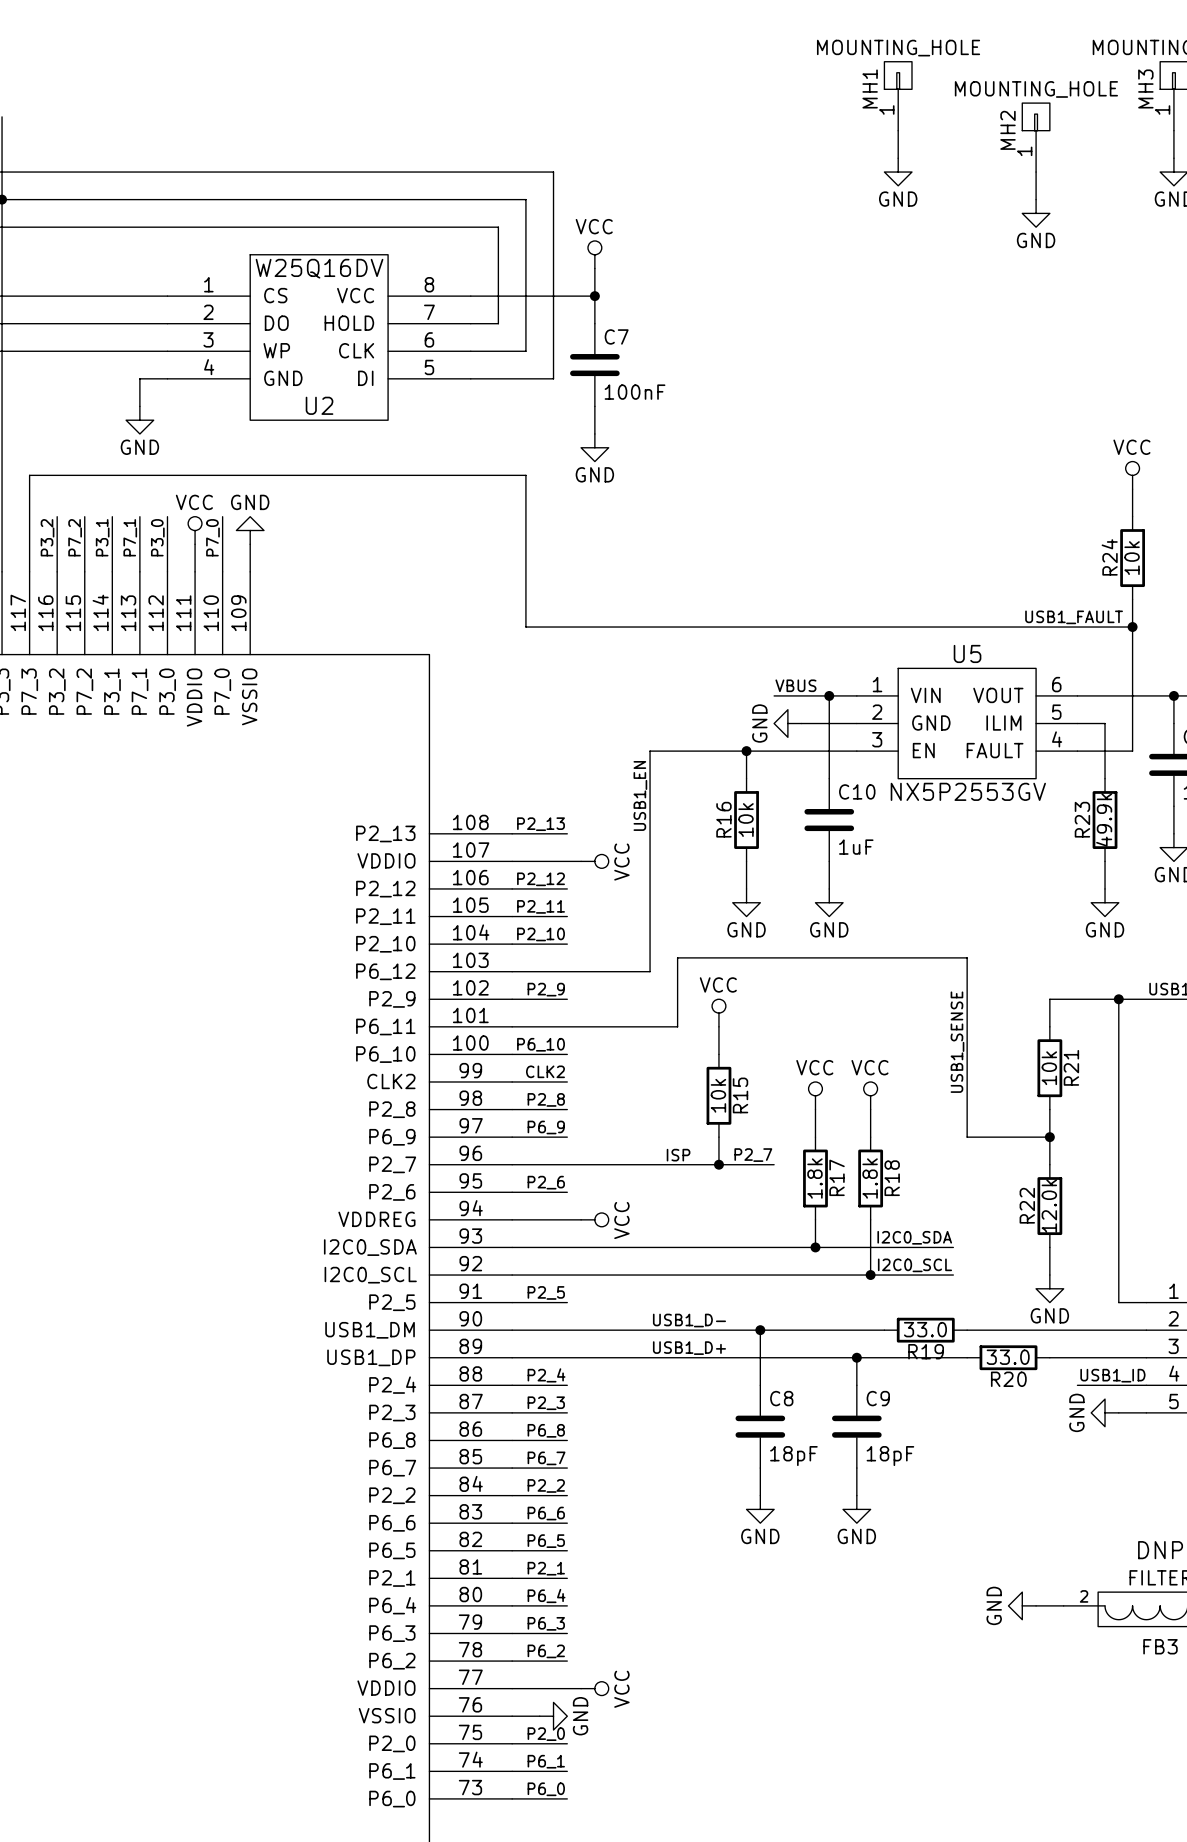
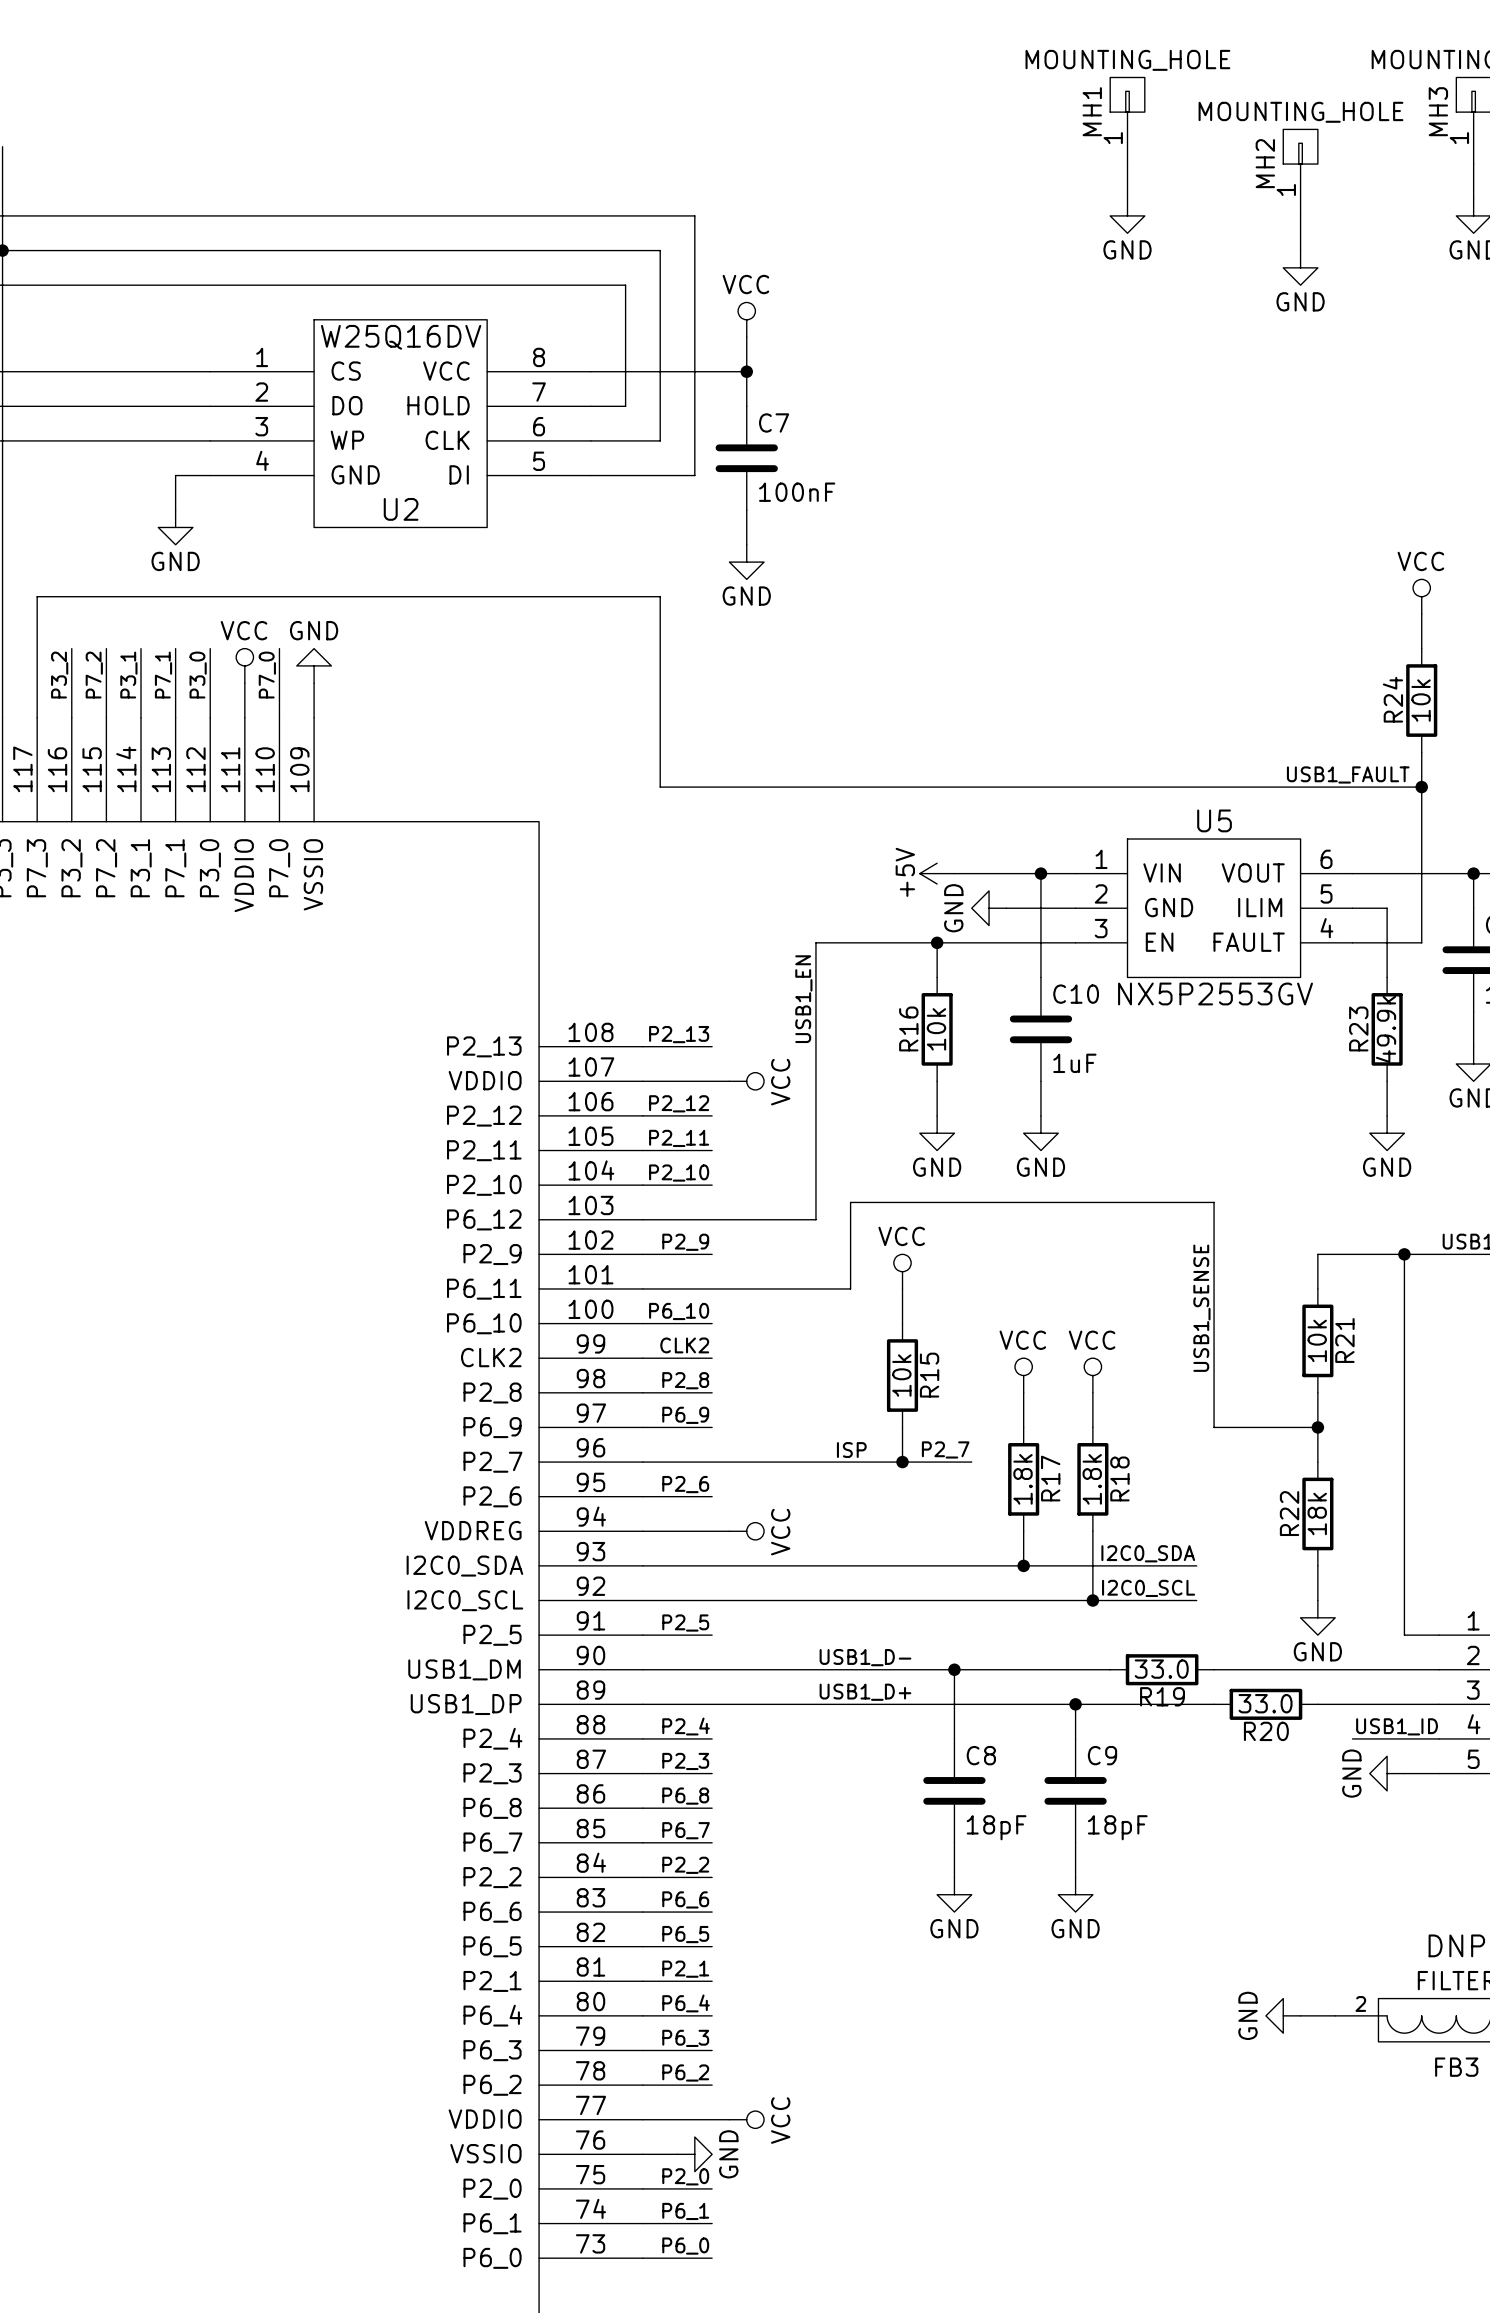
label: VBUS (795, 685) -> none
power symbol: none -> +5V (937, 873)
wire: none -> (954, 873) (971, 873)
R22 value: 12.0k (1049, 1206) -> 18k (1317, 1513)

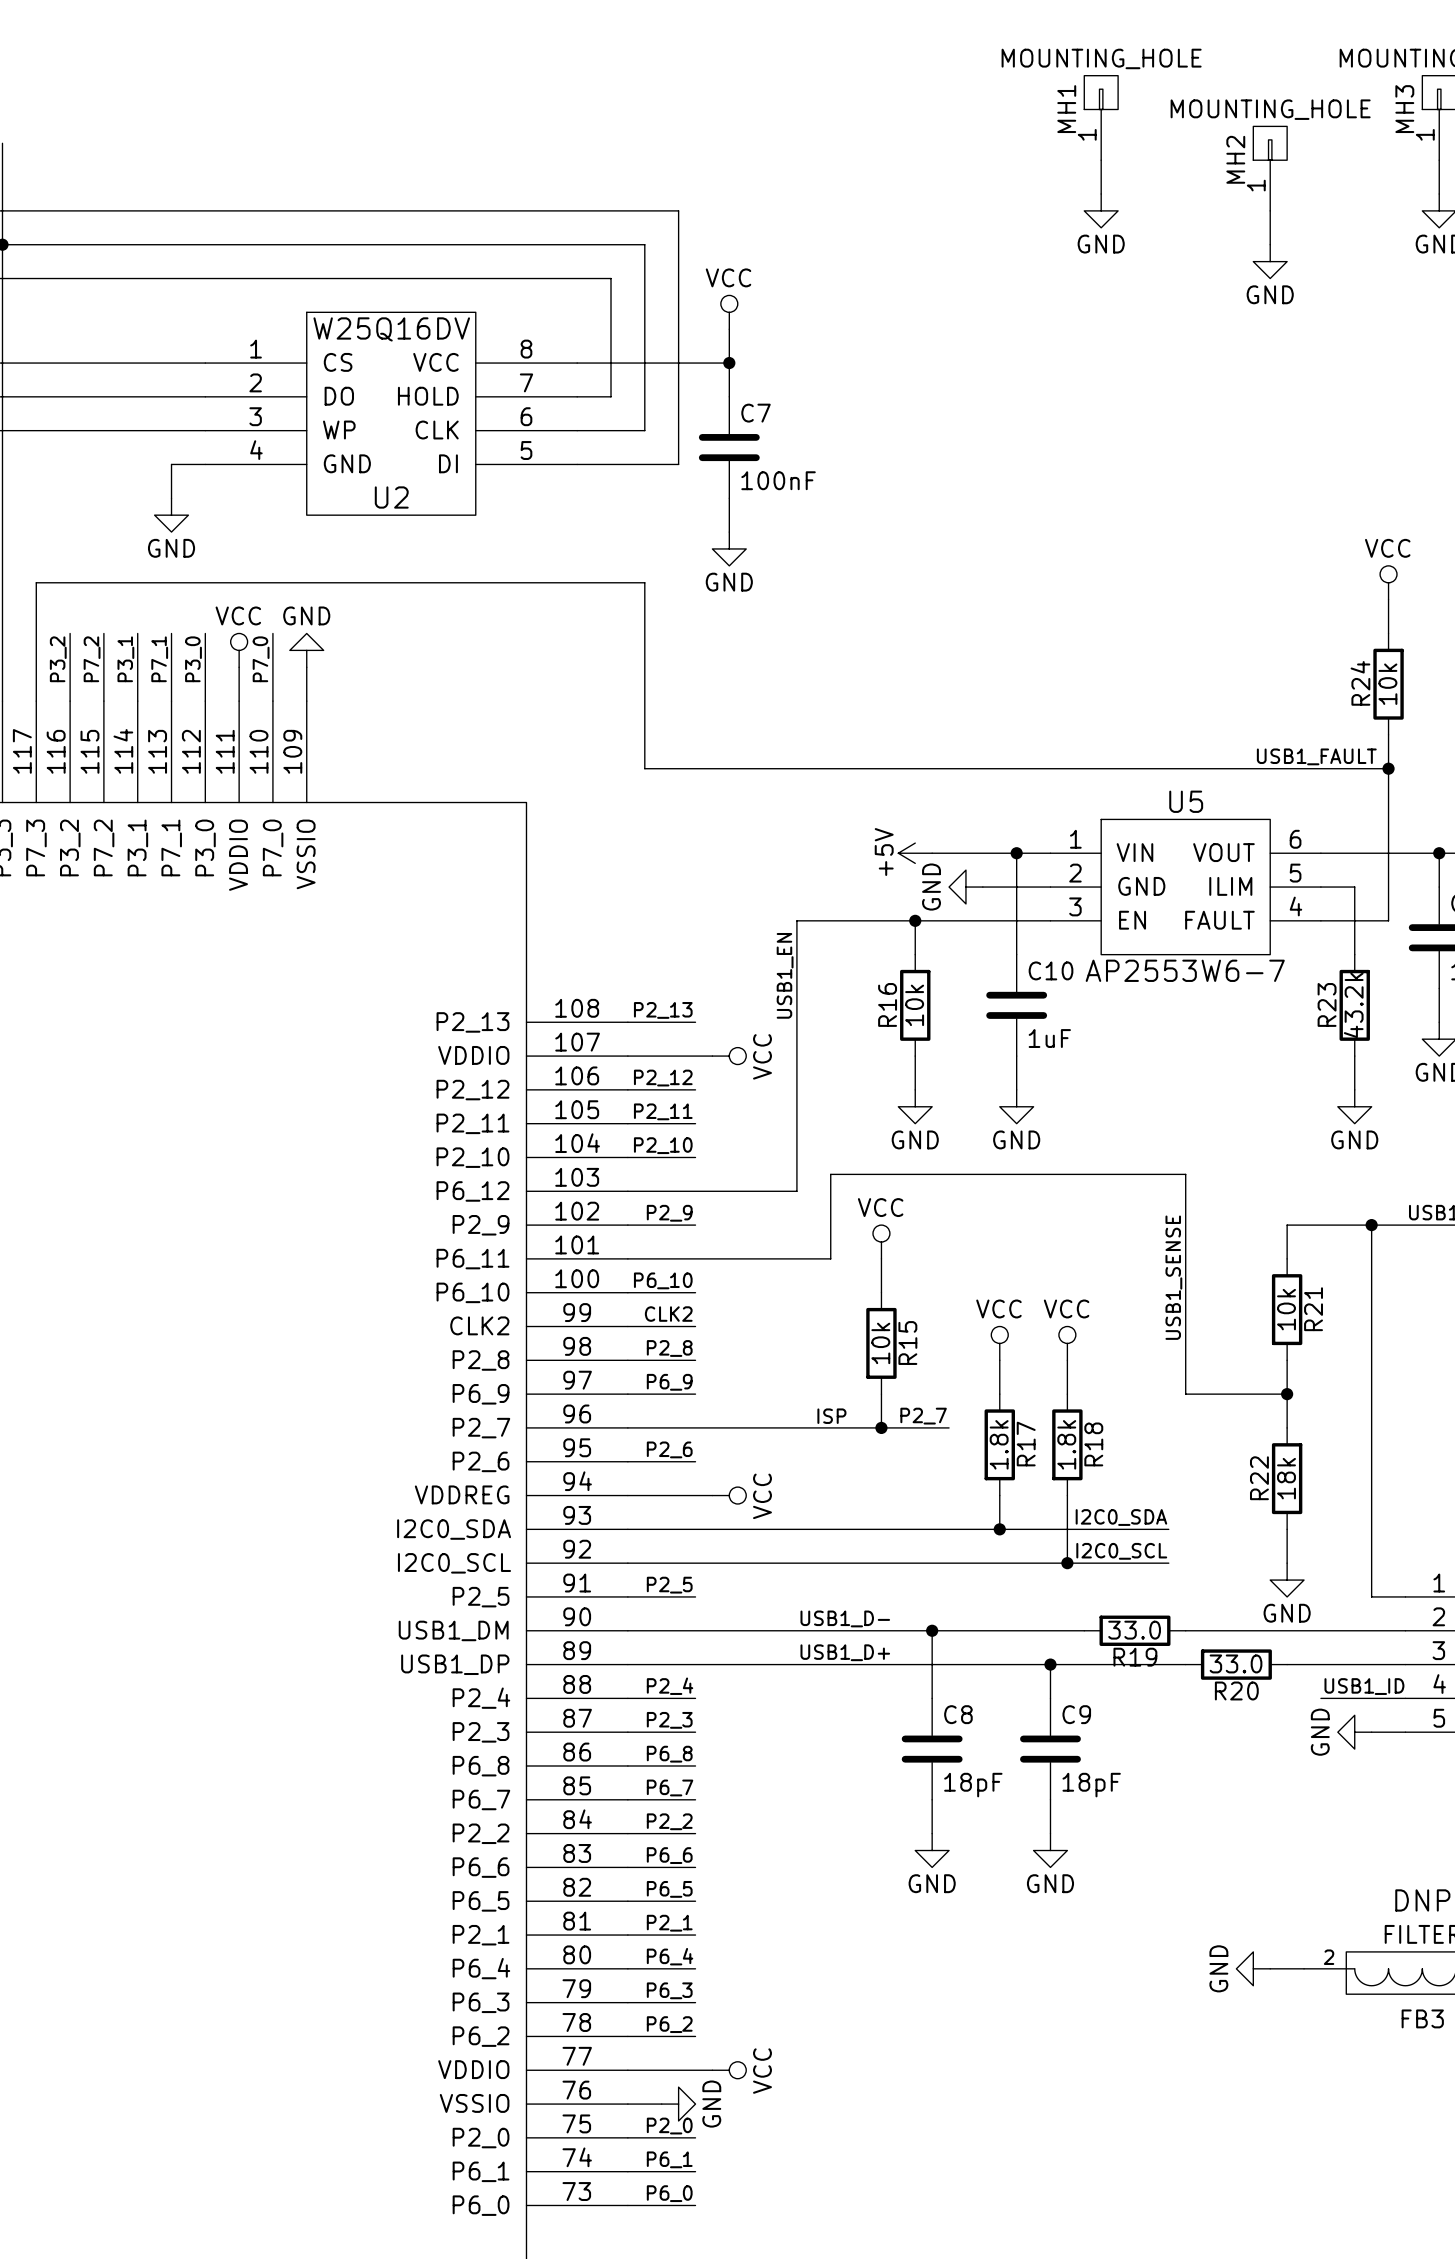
U5 value: NX5P2553GV (1215, 993) -> AP2553W6-7 (1185, 970)
R23 value: 49.9k (1386, 1029) -> 43.2k (1353, 1005)

